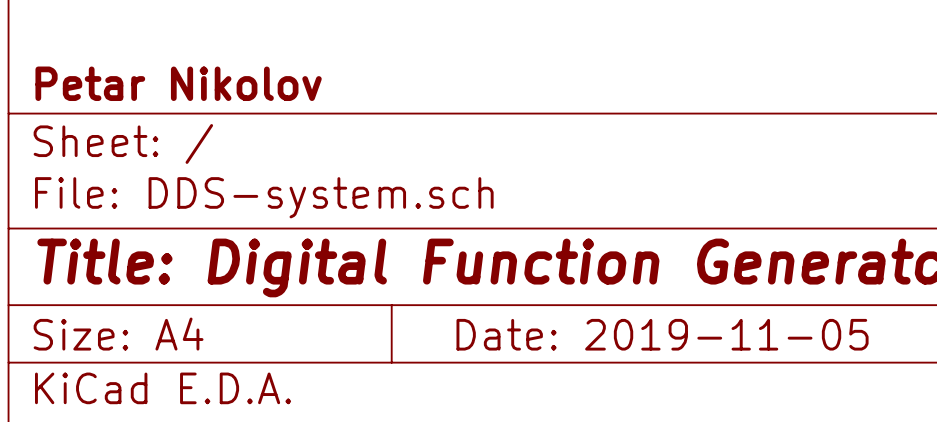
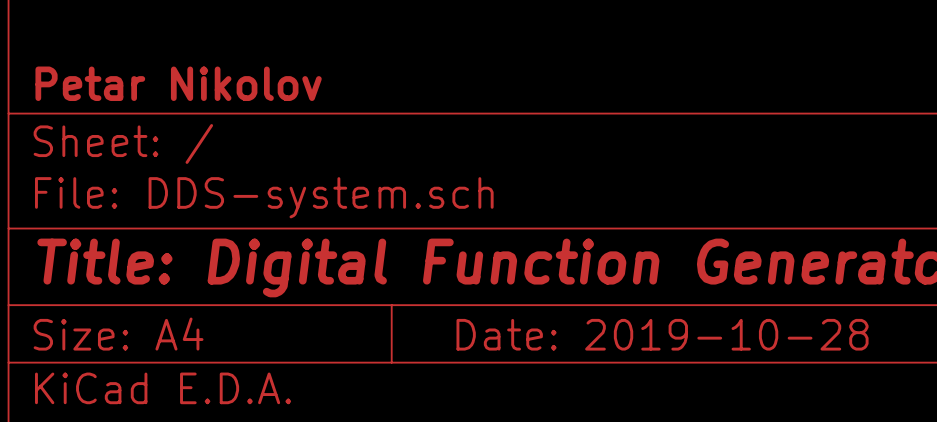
title block: Date: 2019-11-05 (662, 334) -> Date: 2019-10-28 (662, 334)

